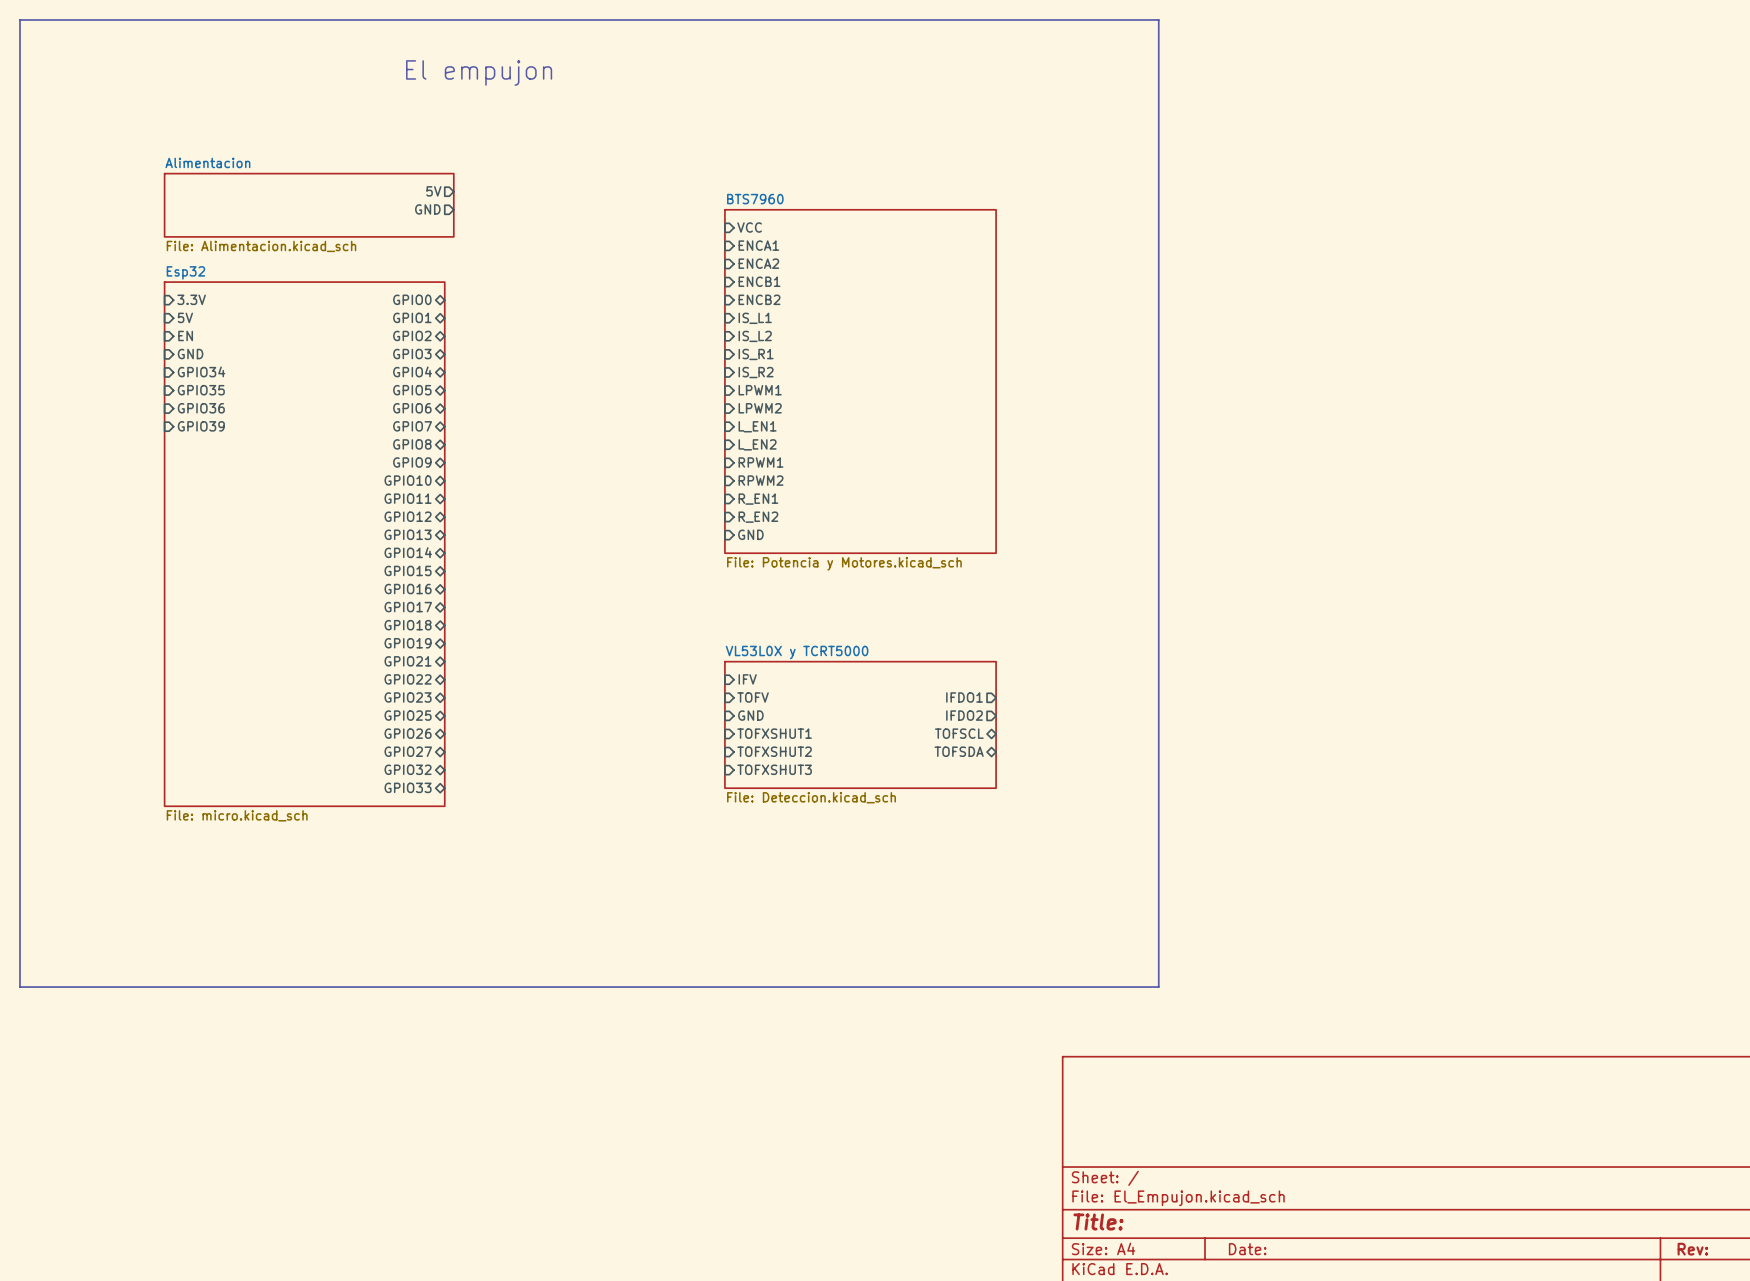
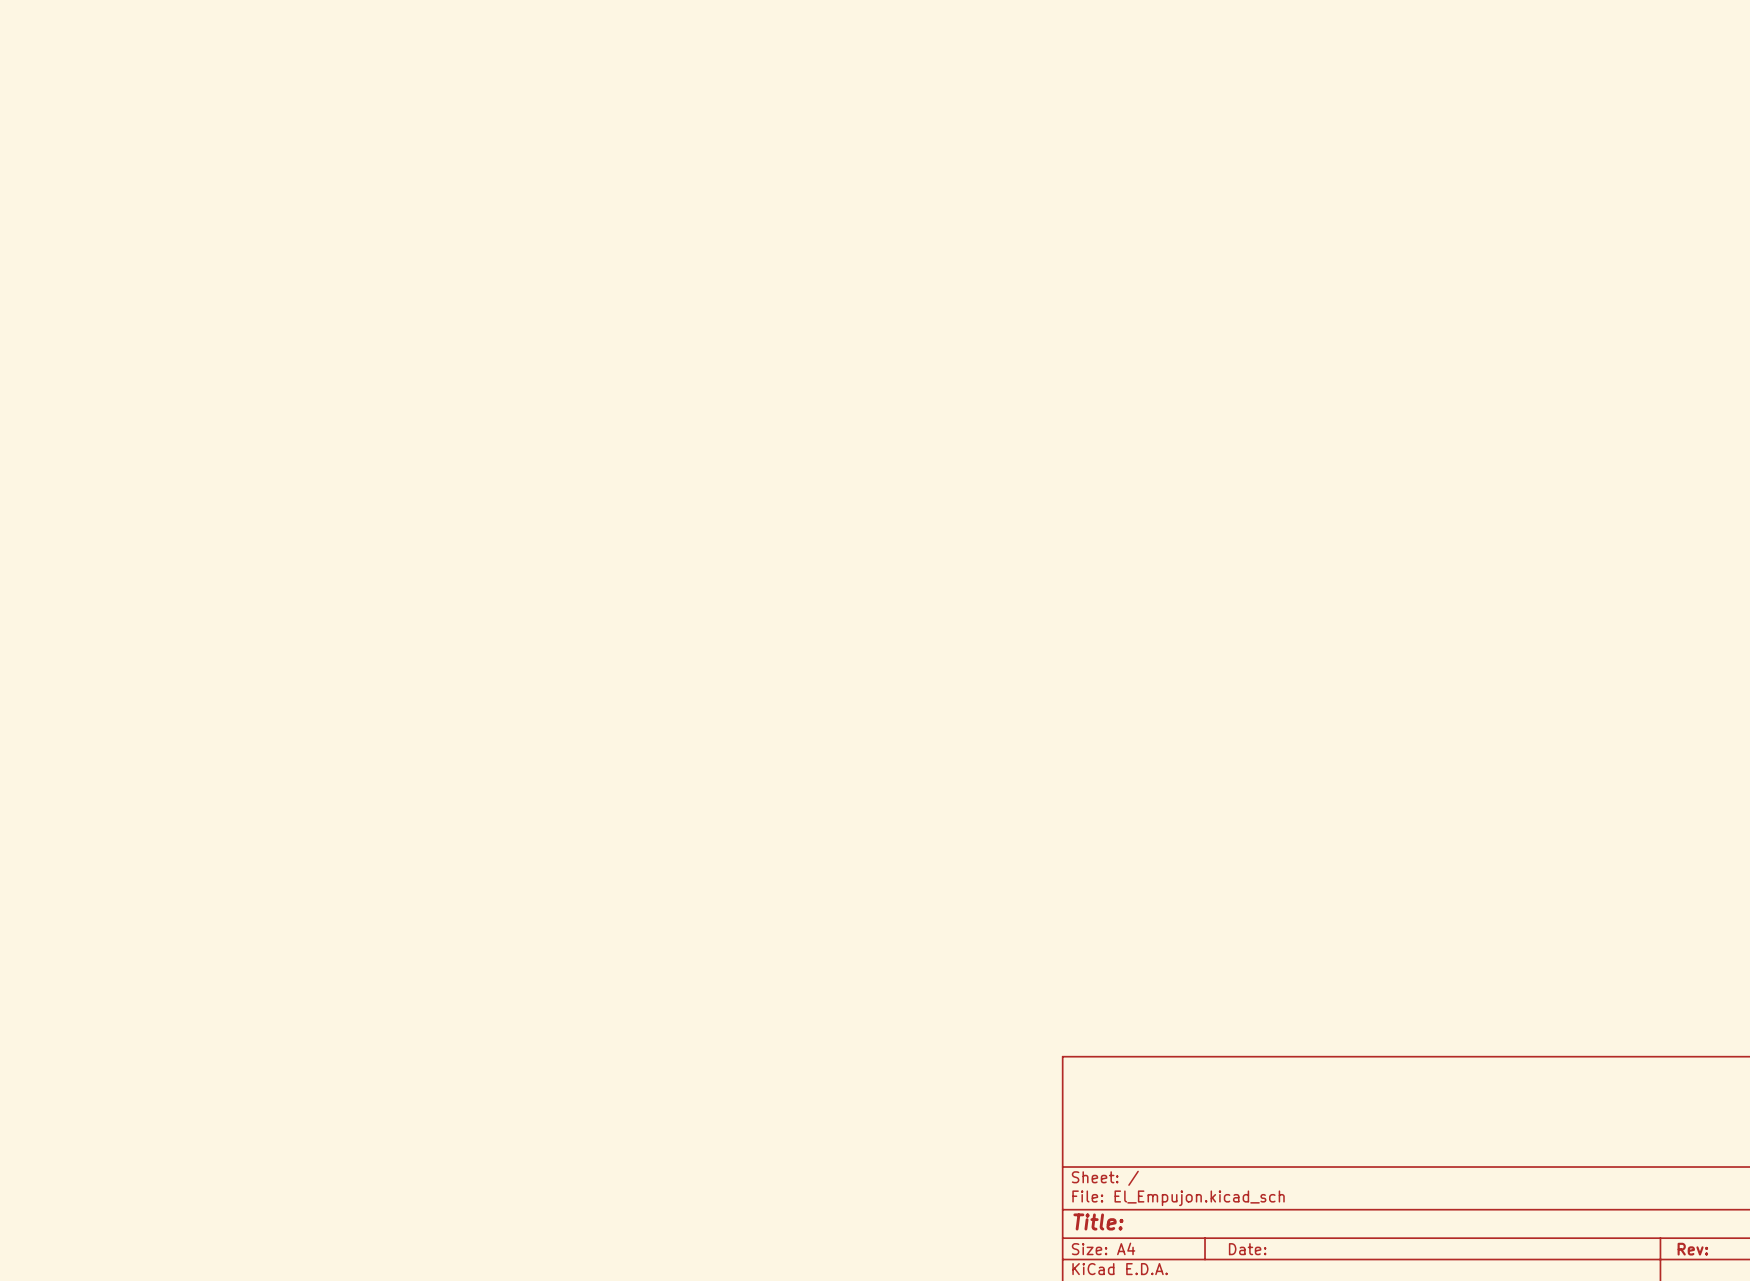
line: (19, 19) (1158, 19) (1158, 987) (19, 987) (19, 19) -> none
text: El empujon (479, 72) -> none
sheet pin: 5V (433, 191) -> none
sheet Alimentacion: File: Alimentacion.kicad_sch (309, 205) -> none
sheet pin: GND (427, 209) -> none
sheet pin: VCC (749, 227) -> none
sheet pin: ENCA1 (758, 245) -> none
sheet pin: ENCA2 (758, 263) -> none
sheet pin: ENCB1 (759, 281) -> none
sheet pin: 3.3V (191, 299) -> none
sheet pin: GPIO0 (412, 299) -> none
sheet pin: ENCB2 (759, 299) -> none
sheet pin: 5V (185, 317) -> none
sheet pin: GPIO1 (412, 317) -> none
sheet pin: IS_L1 (755, 318) -> none
sheet pin: EN (185, 335) -> none
sheet pin: GPIO2 (412, 335) -> none
sheet pin: IS_L2 (755, 336) -> none
sheet pin: GND (190, 354) -> none
sheet pin: GPIO3 (412, 354) -> none
sheet pin: IS_R1 (756, 354) -> none
sheet pin: GPIO34 (201, 371) -> none
sheet pin: GPIO4 (412, 371) -> none
sheet pin: IS_R2 (756, 372) -> none
sheet BTS7960: File: Potencia y Motores.kicad_sch (860, 381) -> none
sheet pin: GPIO35 (201, 390) -> none
sheet pin: GPIO5 (412, 390) -> none
sheet pin: LPWM1 (760, 390) -> none
sheet pin: GPIO36 (201, 408) -> none
sheet pin: GPIO6 (412, 408) -> none
sheet pin: LPWM2 (760, 408) -> none
sheet pin: GPIO39 (201, 426) -> none
sheet pin: GPIO7 (412, 426) -> none
sheet pin: L_EN1 (757, 426) -> none
sheet pin: GPIO8 (412, 444) -> none
sheet pin: L_EN2 (757, 444) -> none
sheet pin: GPIO9 (412, 462) -> none
sheet pin: RPWM1 (761, 462) -> none
sheet pin: GPIO10 (408, 480) -> none
sheet pin: RPWM2 (761, 480) -> none
sheet pin: GPIO11 (408, 498) -> none
sheet pin: R_EN1 (758, 499) -> none
sheet pin: GPIO12 (408, 516) -> none
sheet pin: R_EN2 (758, 517) -> none
sheet pin: GPIO13 (408, 534) -> none
sheet pin: GND (750, 534) -> none
sheet Esp32: File: micro.kicad_sch (304, 544) -> none
sheet pin: GPIO14 (408, 552) -> none
sheet pin: GPIO15 (408, 570) -> none
sheet pin: GPIO16 (408, 589) -> none
sheet pin: GPIO17 (408, 607) -> none
sheet pin: GPIO18 (408, 625) -> none
sheet pin: GPIO19 (408, 643) -> none
sheet pin: GPIO21 (408, 661) -> none
sheet pin: GPIO22 (408, 679) -> none
sheet pin: IFV (747, 679) -> none
sheet pin: GPIO23 (408, 697) -> none
sheet pin: TOFV (753, 697) -> none
sheet pin: IFDO1 (964, 697) -> none
sheet pin: GPIO25 (408, 715) -> none
sheet pin: GND (750, 715) -> none
sheet pin: IFDO2 (964, 715) -> none
sheet VL53L0X y TCRT5000: File: Deteccion.kicad_sch (860, 724) -> none
sheet pin: GPIO26 (408, 733) -> none
sheet pin: TOFXSHUT1 (774, 733) -> none
sheet pin: TOFSCL (959, 733) -> none
sheet pin: GPIO27 (408, 751) -> none
sheet pin: TOFXSHUT2 (774, 751) -> none
sheet pin: TOFSDA (959, 751) -> none
sheet pin: GPIO32 (408, 769) -> none
sheet pin: TOFXSHUT3 (774, 769) -> none
sheet pin: GPIO33 (408, 787) -> none

